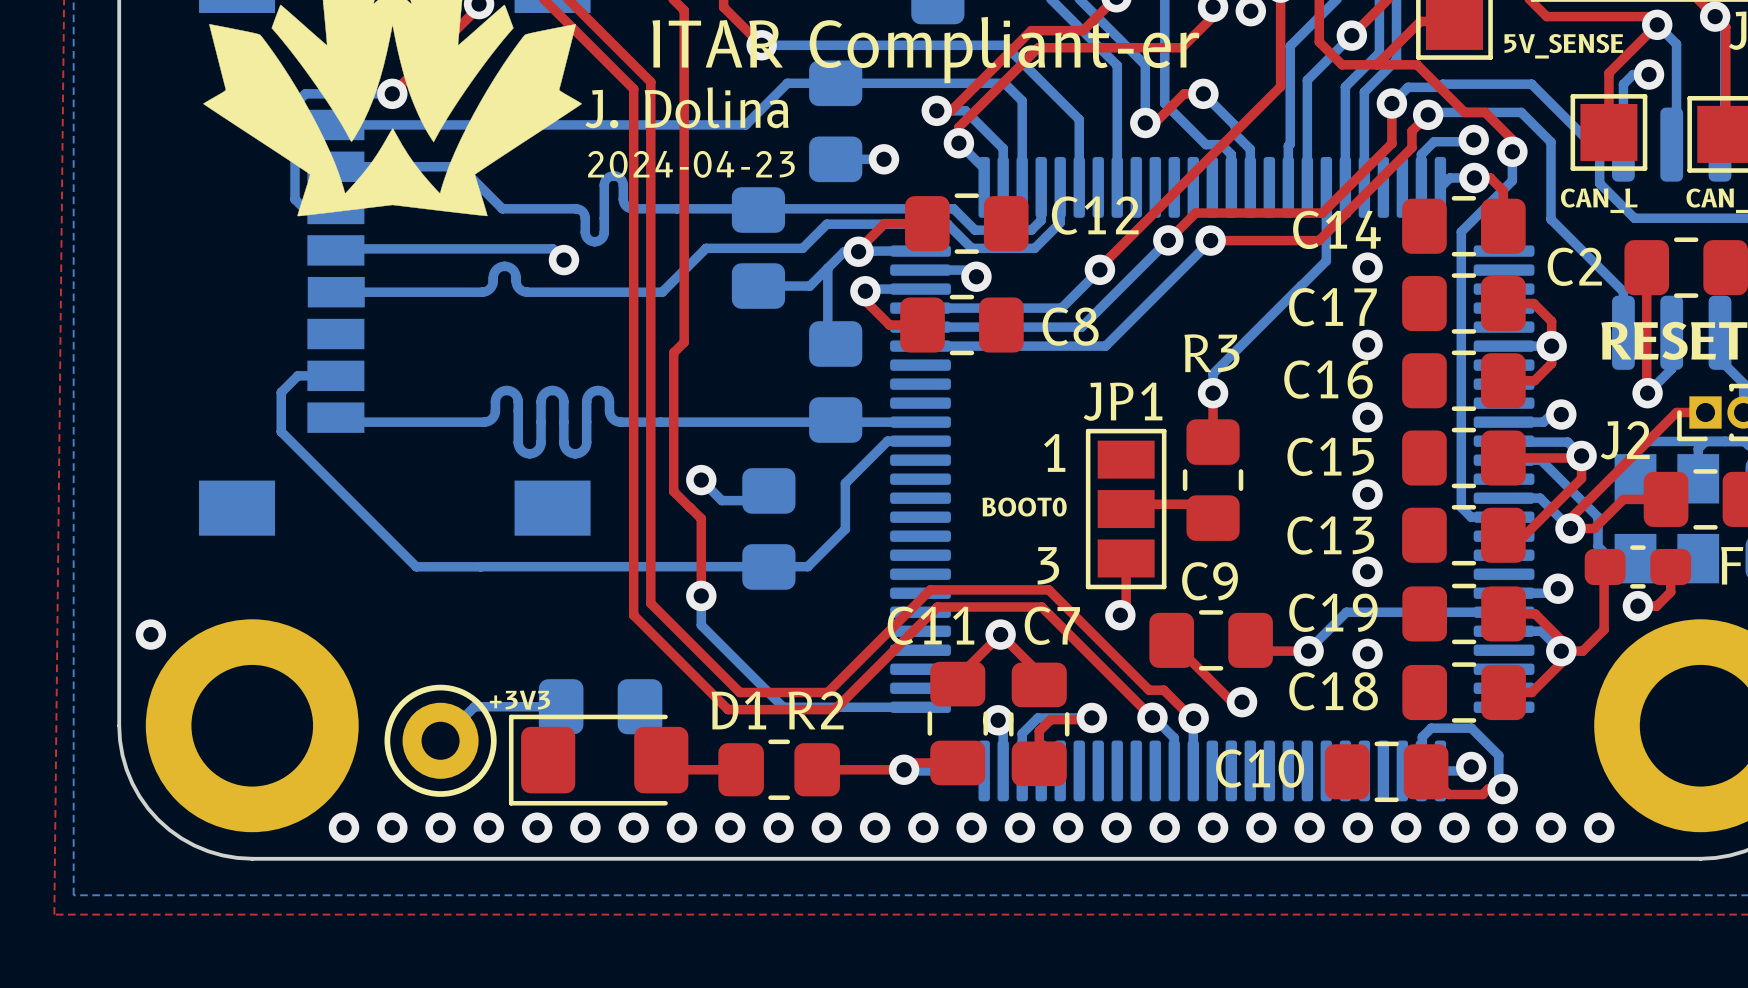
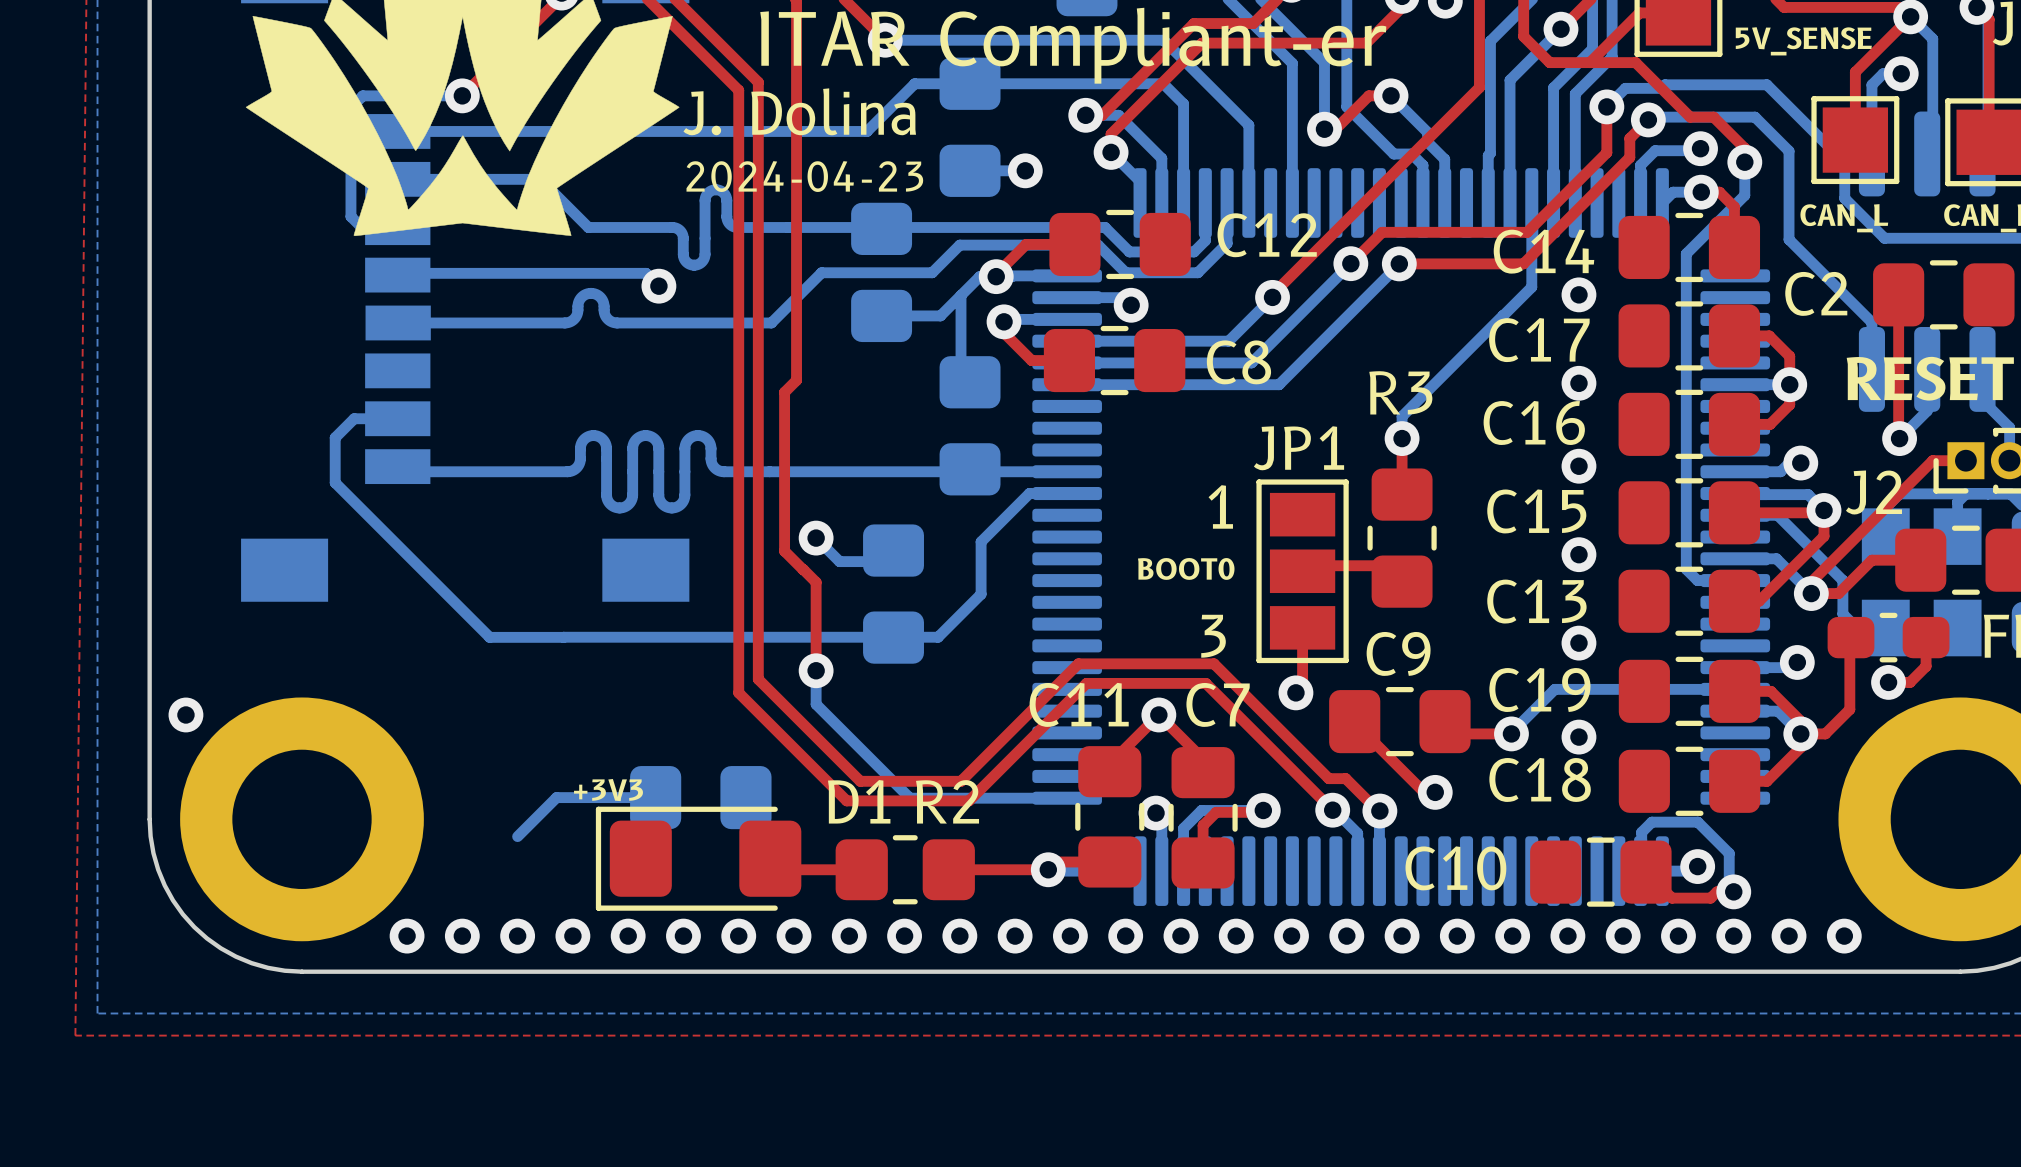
part: (440, 740) -> none

